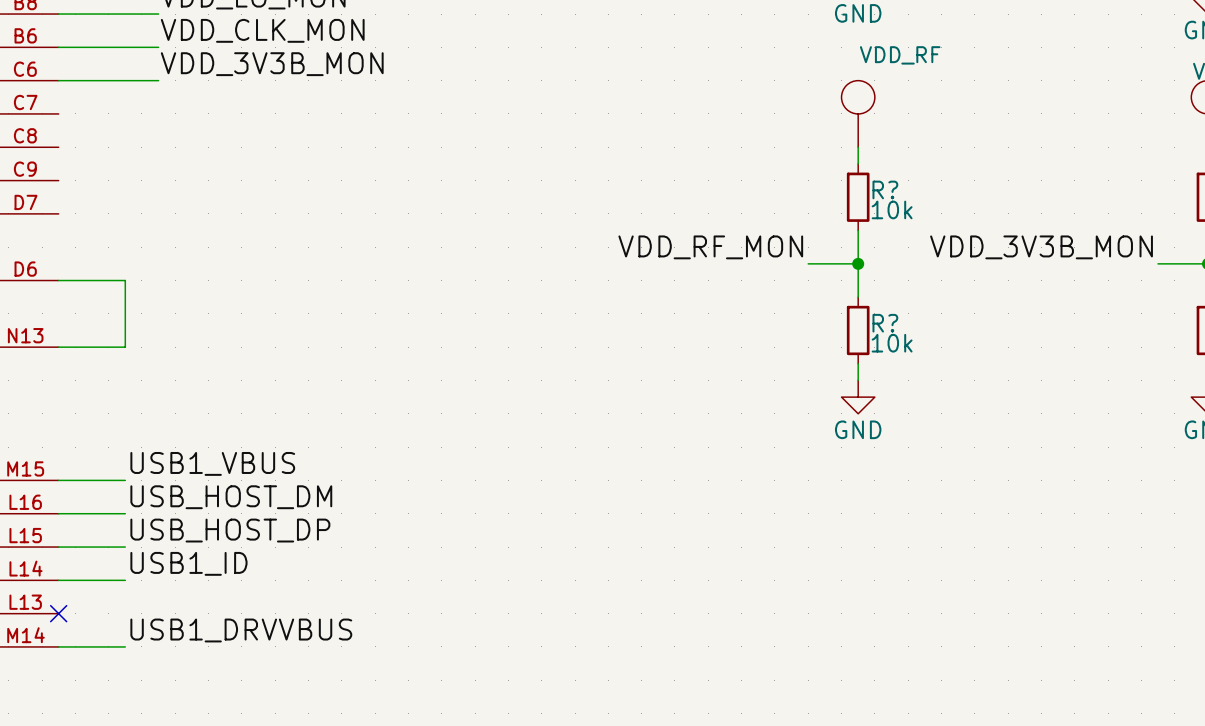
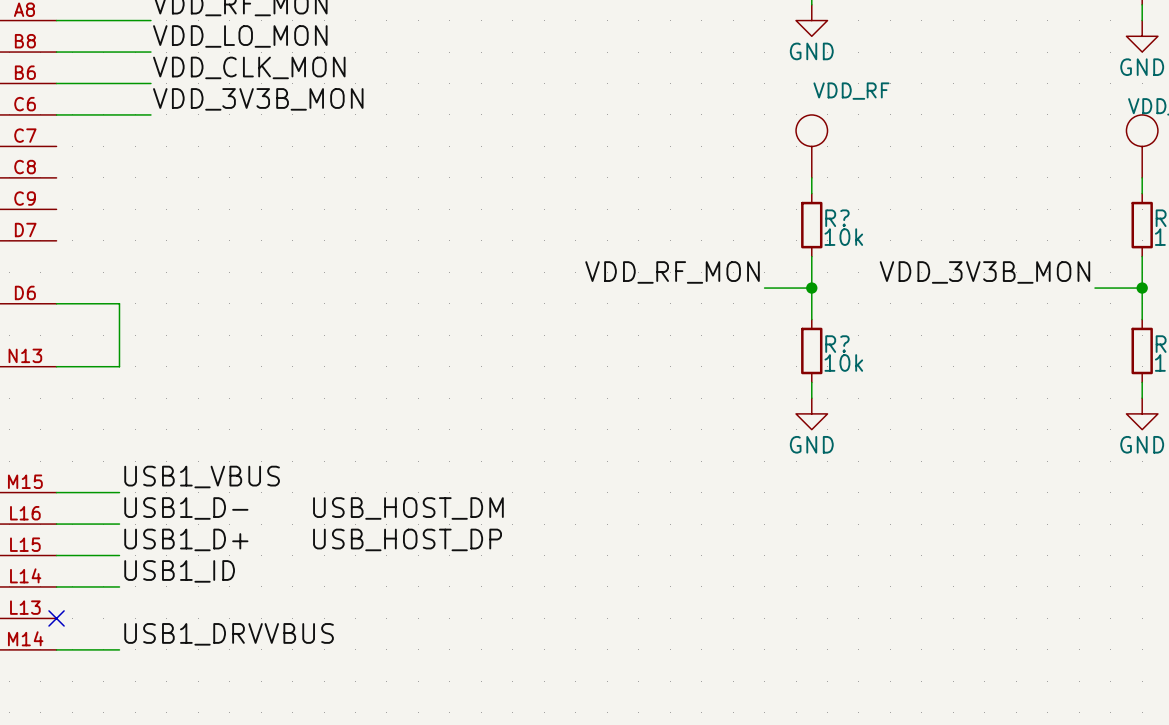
label: USB_HOST_DM (231, 497) -> USB1_D- (186, 508)
label: none -> USB_HOST_DM (408, 508)
label: USB_HOST_DP (230, 530) -> USB1_D+ (186, 539)
label: none -> USB_HOST_DP (407, 539)

